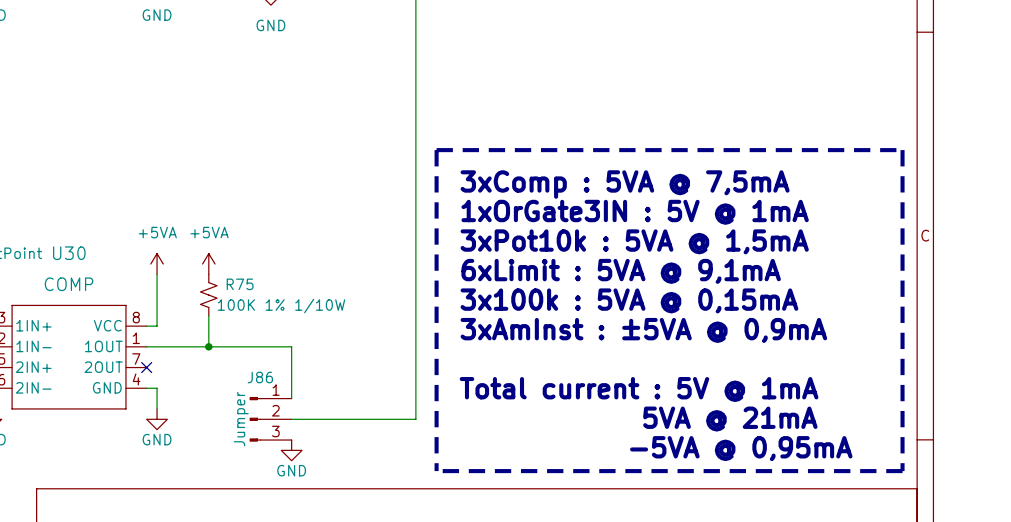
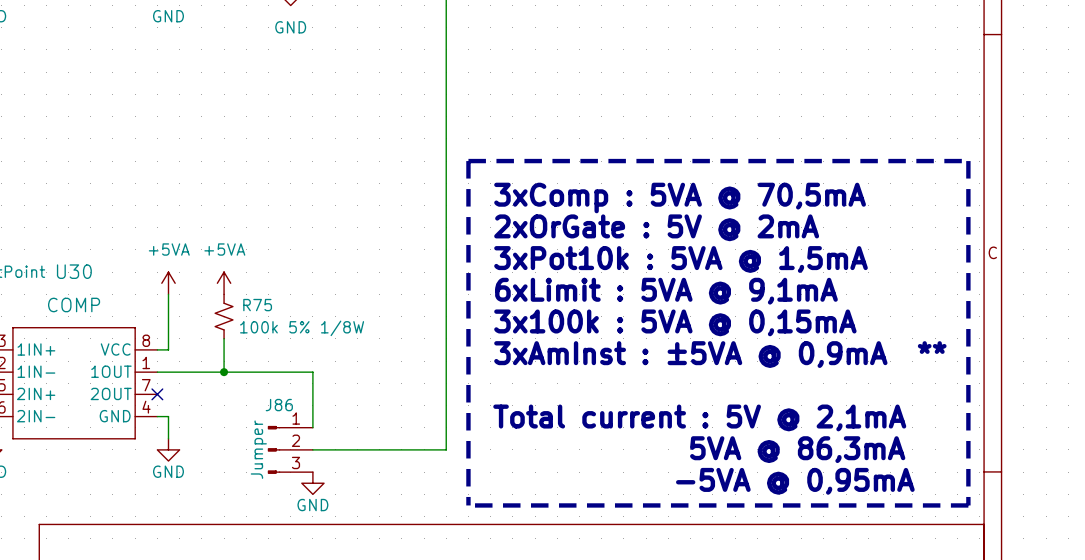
text: 3xComp : 5VA @ 7,5mA (625, 184) -> 3xComp : 5VA @ 70,5mA (680, 197)
text: 1xOrGate3IN : 5V @ 1mA (635, 212) -> 2xOrGate : 5V @ 2mA (656, 227)
R75 value: 100K 1% 1/10W (281, 306) -> 100k 5% 1/8W (302, 328)
text: 3xAmInst : ±5VA @ 0,9mA (643, 330) -> 3xAmInst : ±5VA @ 0,9mA ** (720, 354)
text: Total current : 5V @ 1mA (639, 389) -> Total current : 5V @ 2,1mA (699, 417)
text: 5VA @ 21mA (730, 419) -> 5VA @ 86,3mA (797, 449)

